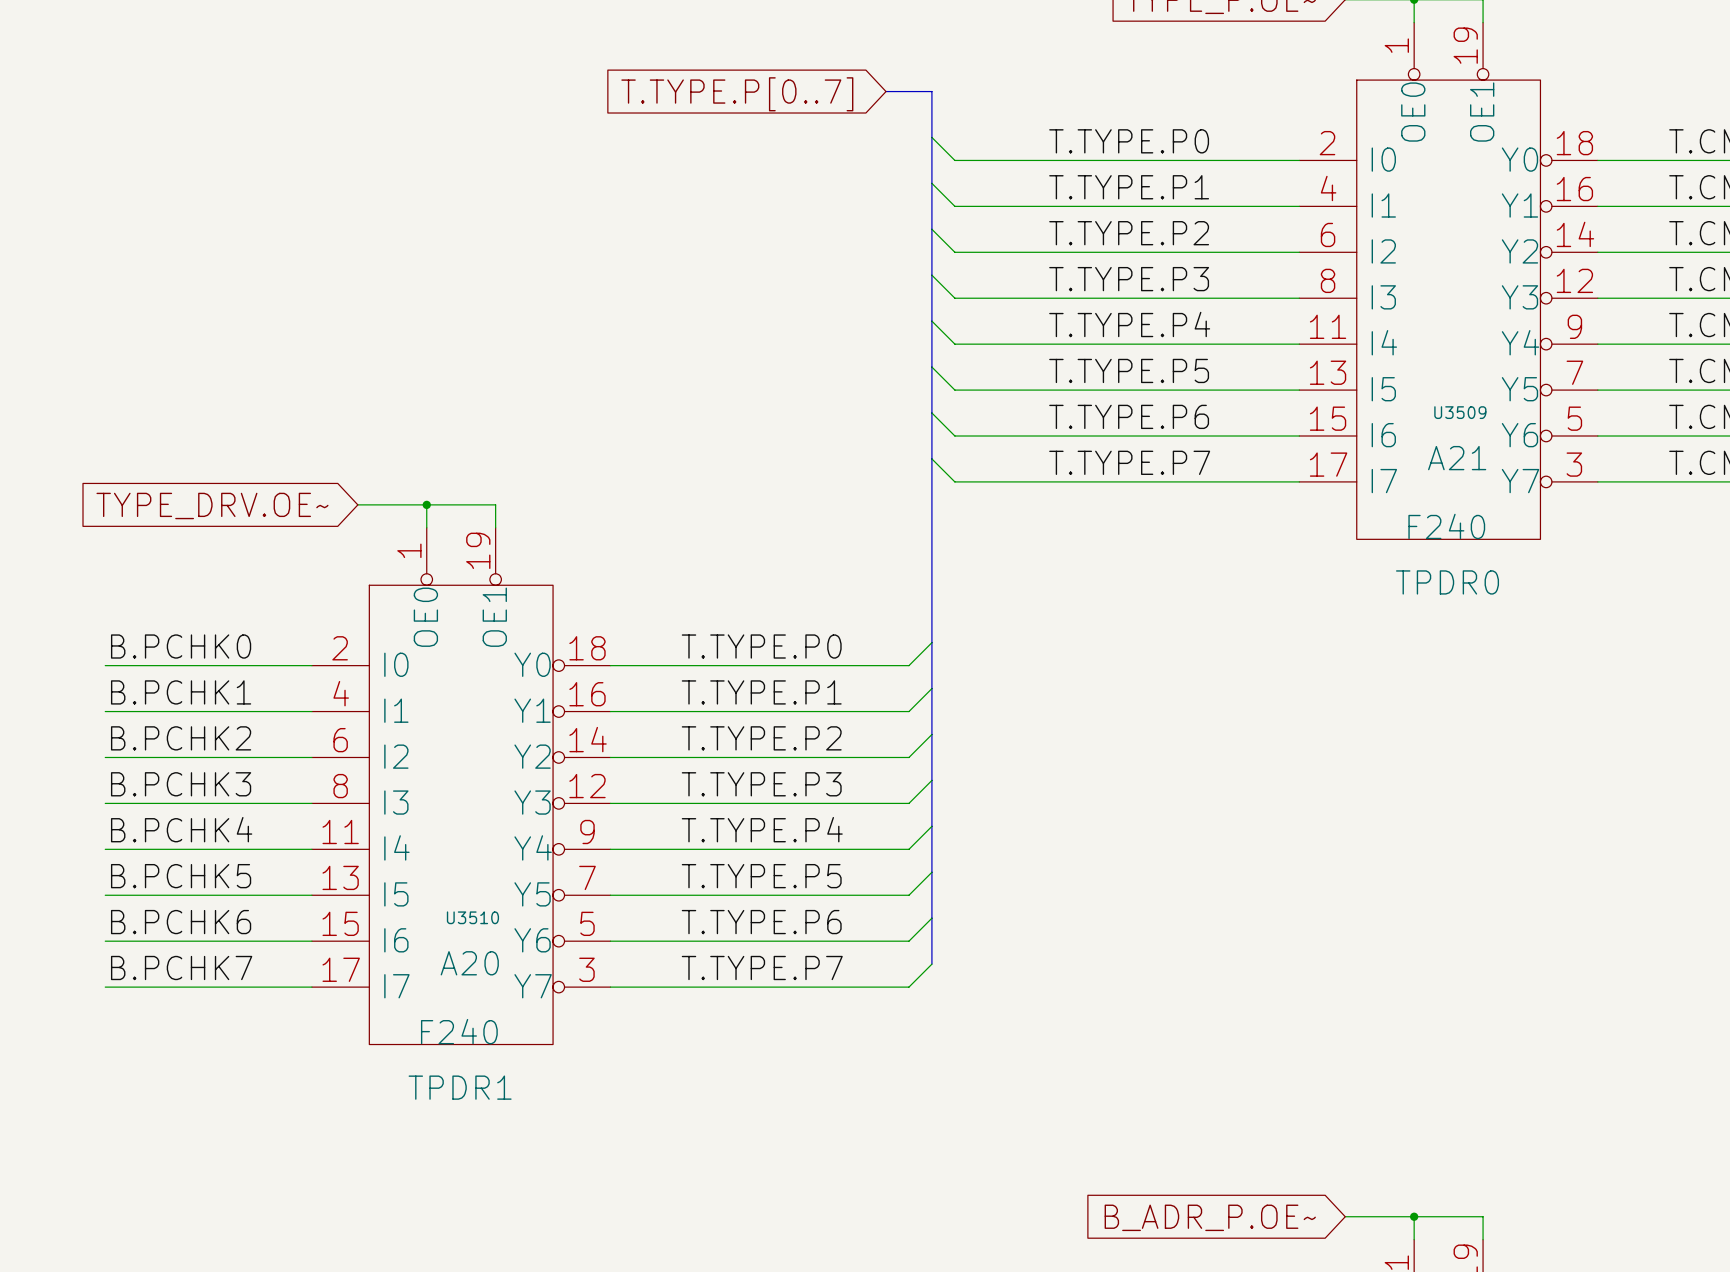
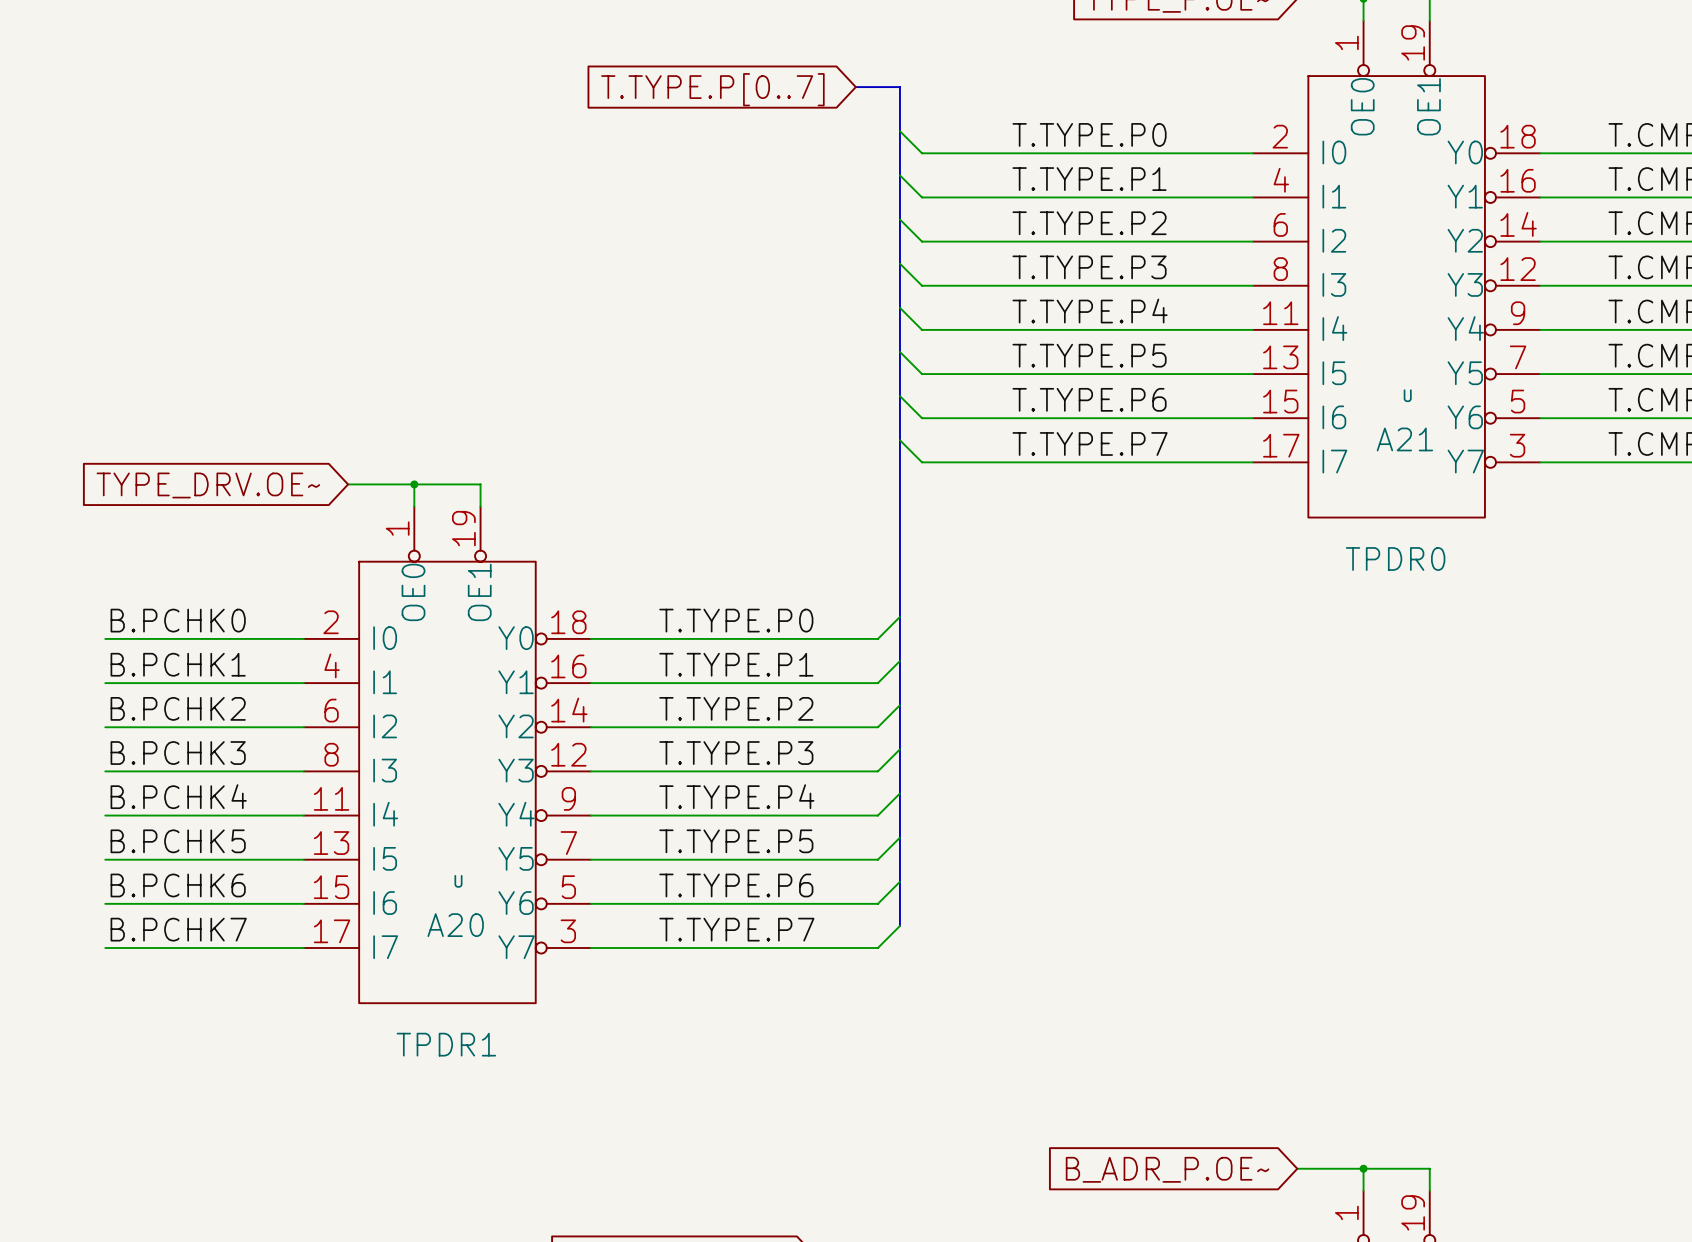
U3509 name: U3509 (1460, 412) -> U (1407, 395)
U3509 value: F240 (1446, 526) -> none
U3510 name: U3510 (472, 917) -> U (458, 881)
U3510 value: F240 (459, 1031) -> none

